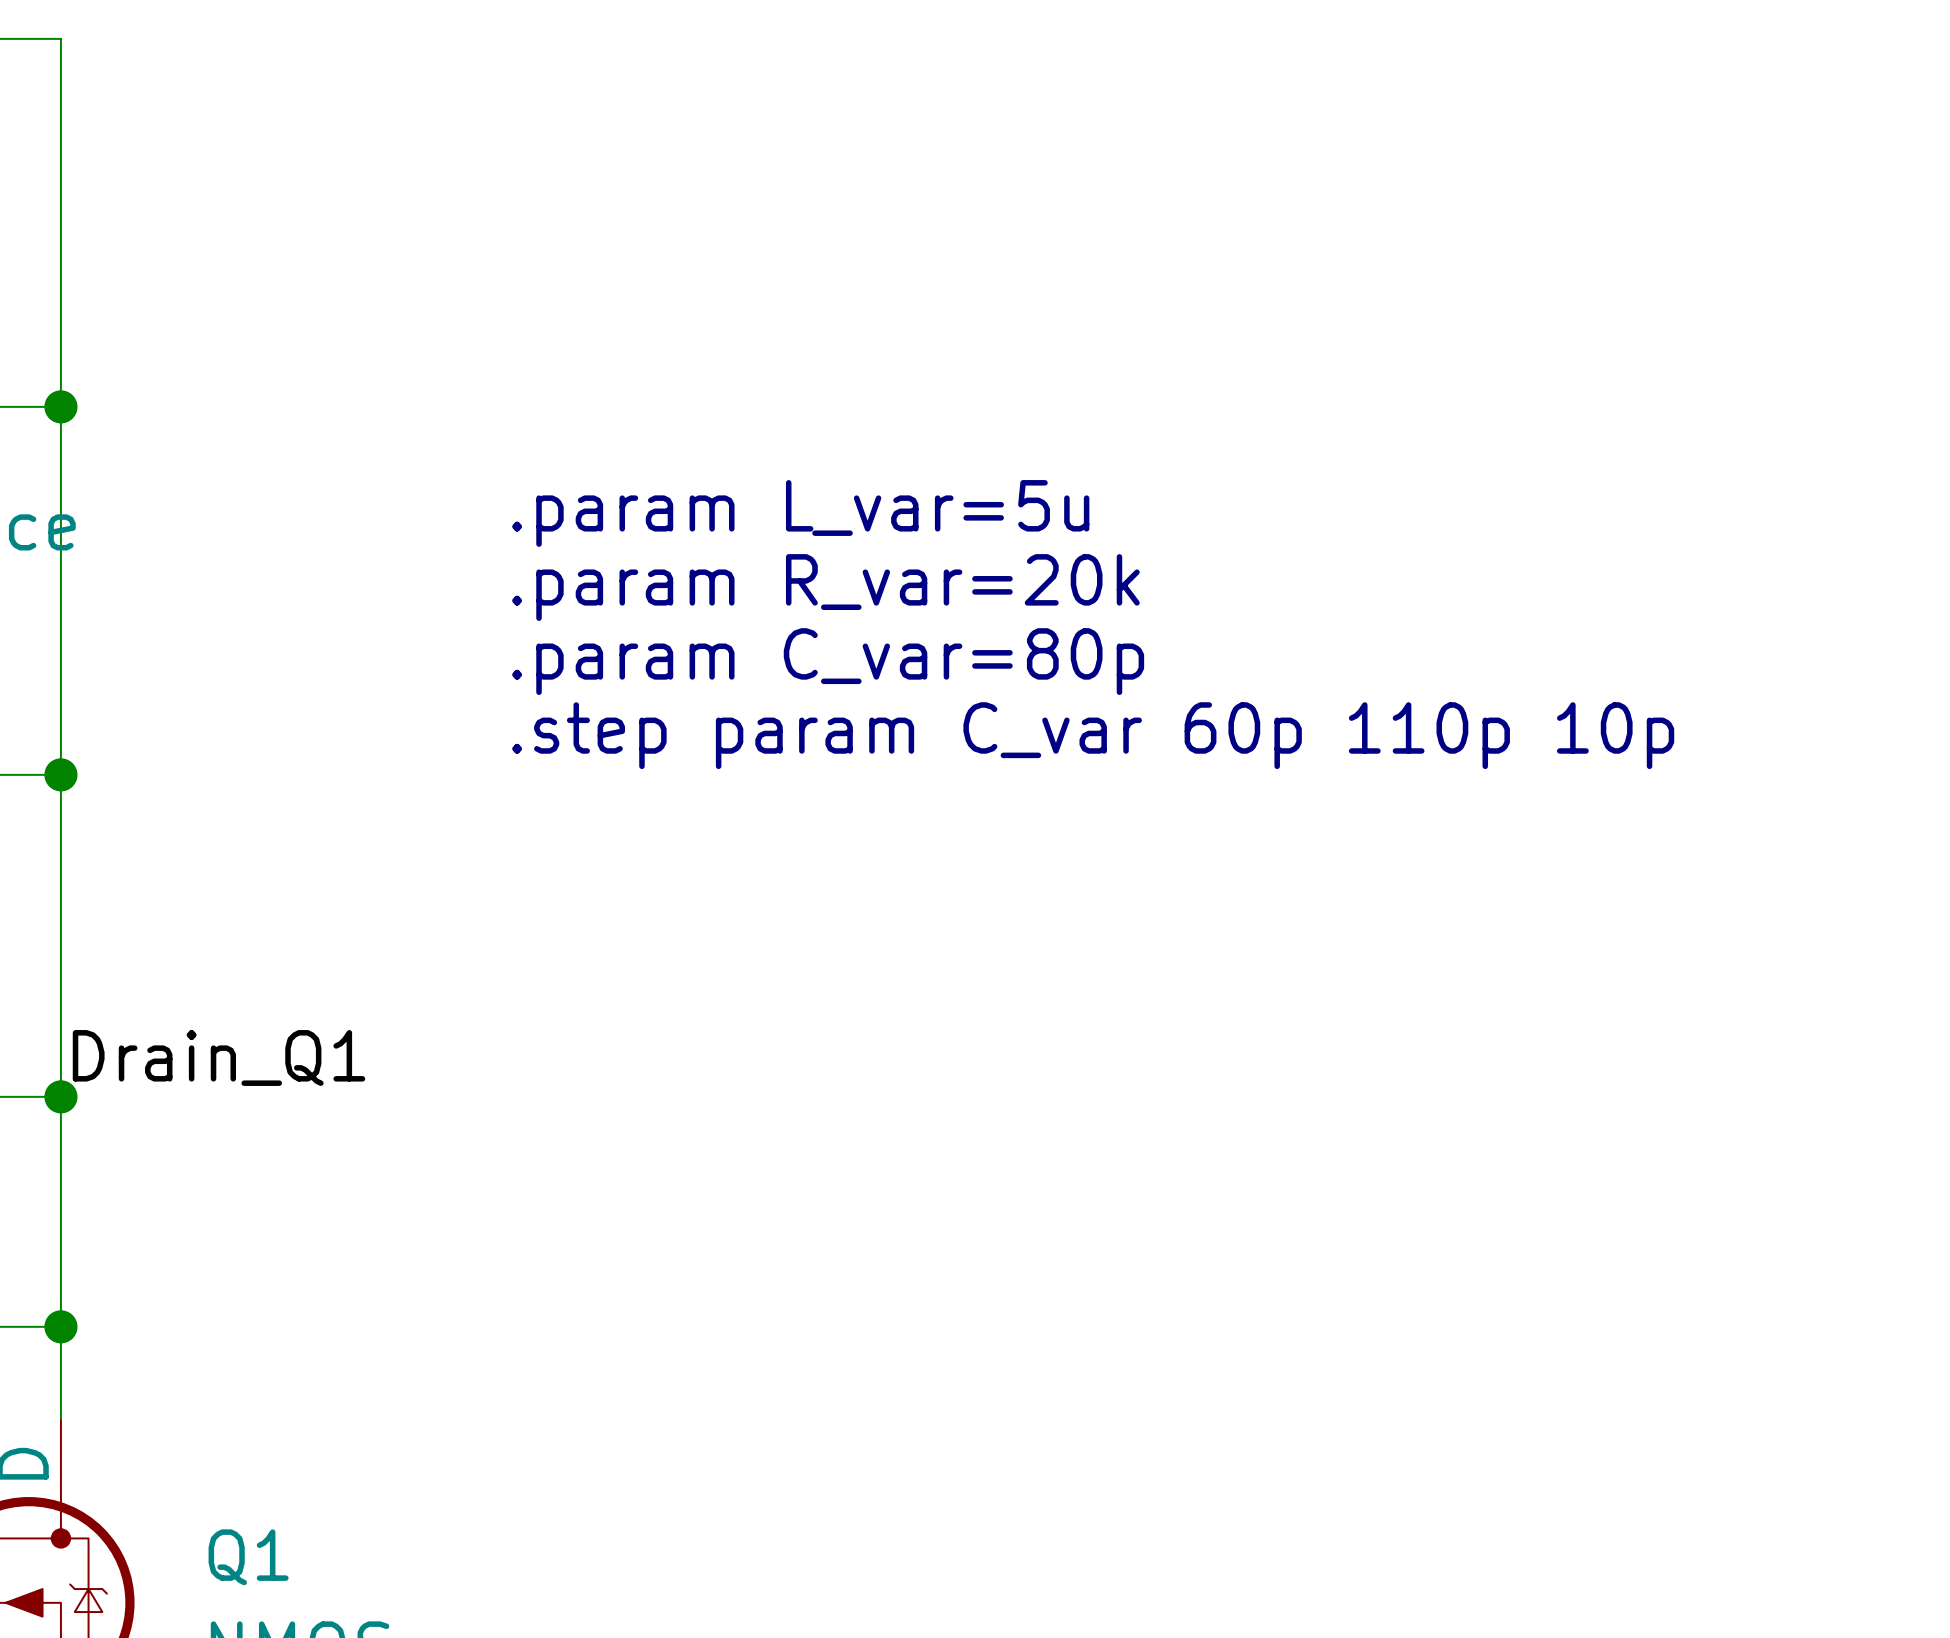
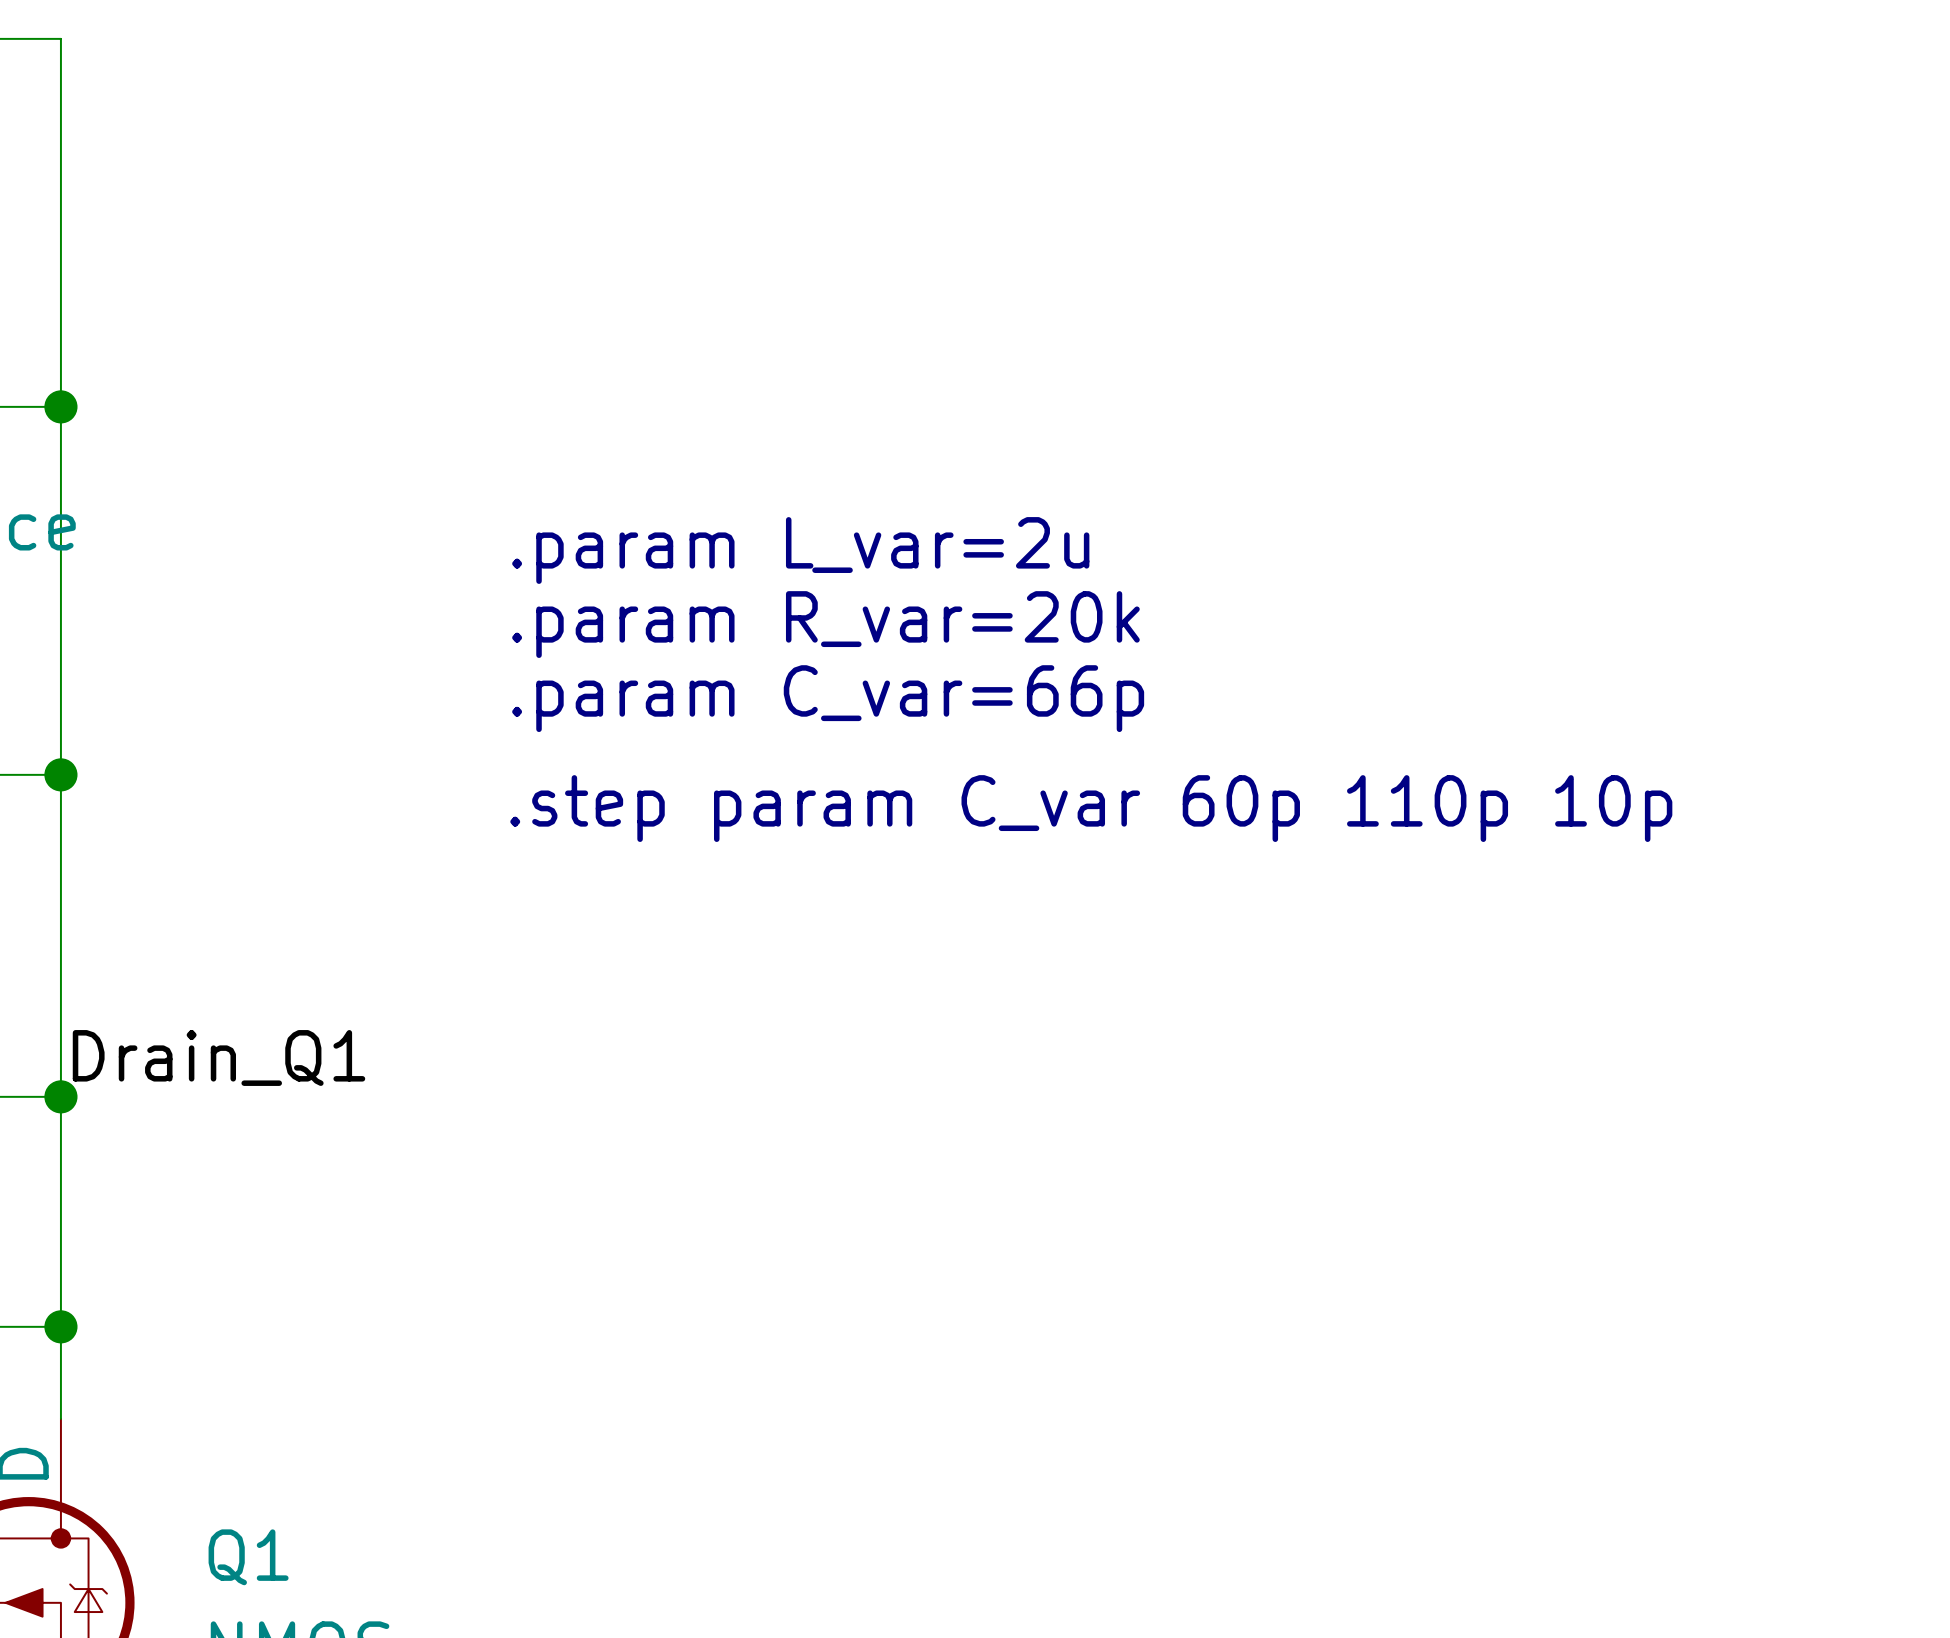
text: .param L_var=5u (800, 513) -> .param L_var=2u (800, 550)
text position: .param R_var=20k (825, 587) -> .param R_var=20k (825, 624)
text: .param C_var=80p (828, 661) -> .param C_var=66p (828, 698)
text position: .step param C_var 60p 110p 10p (1093, 735) -> .step param C_var 60p 110p 10p (1091, 808)

